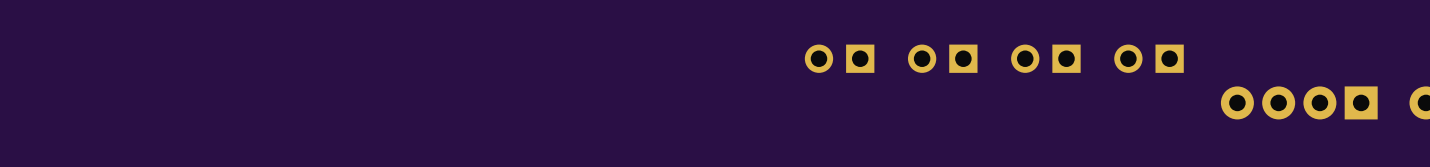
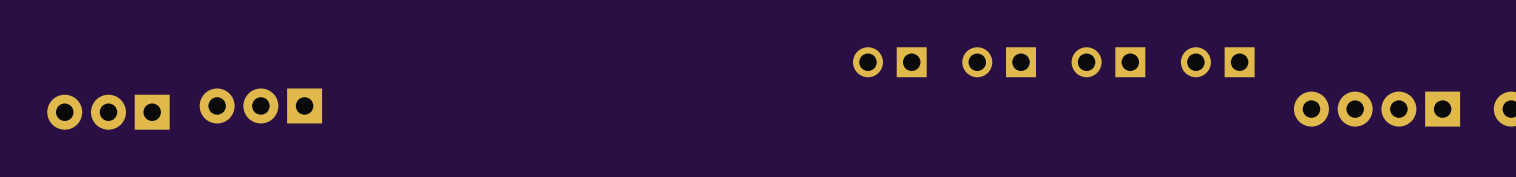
part: none -> (260, 105)
part: none -> (108, 112)

